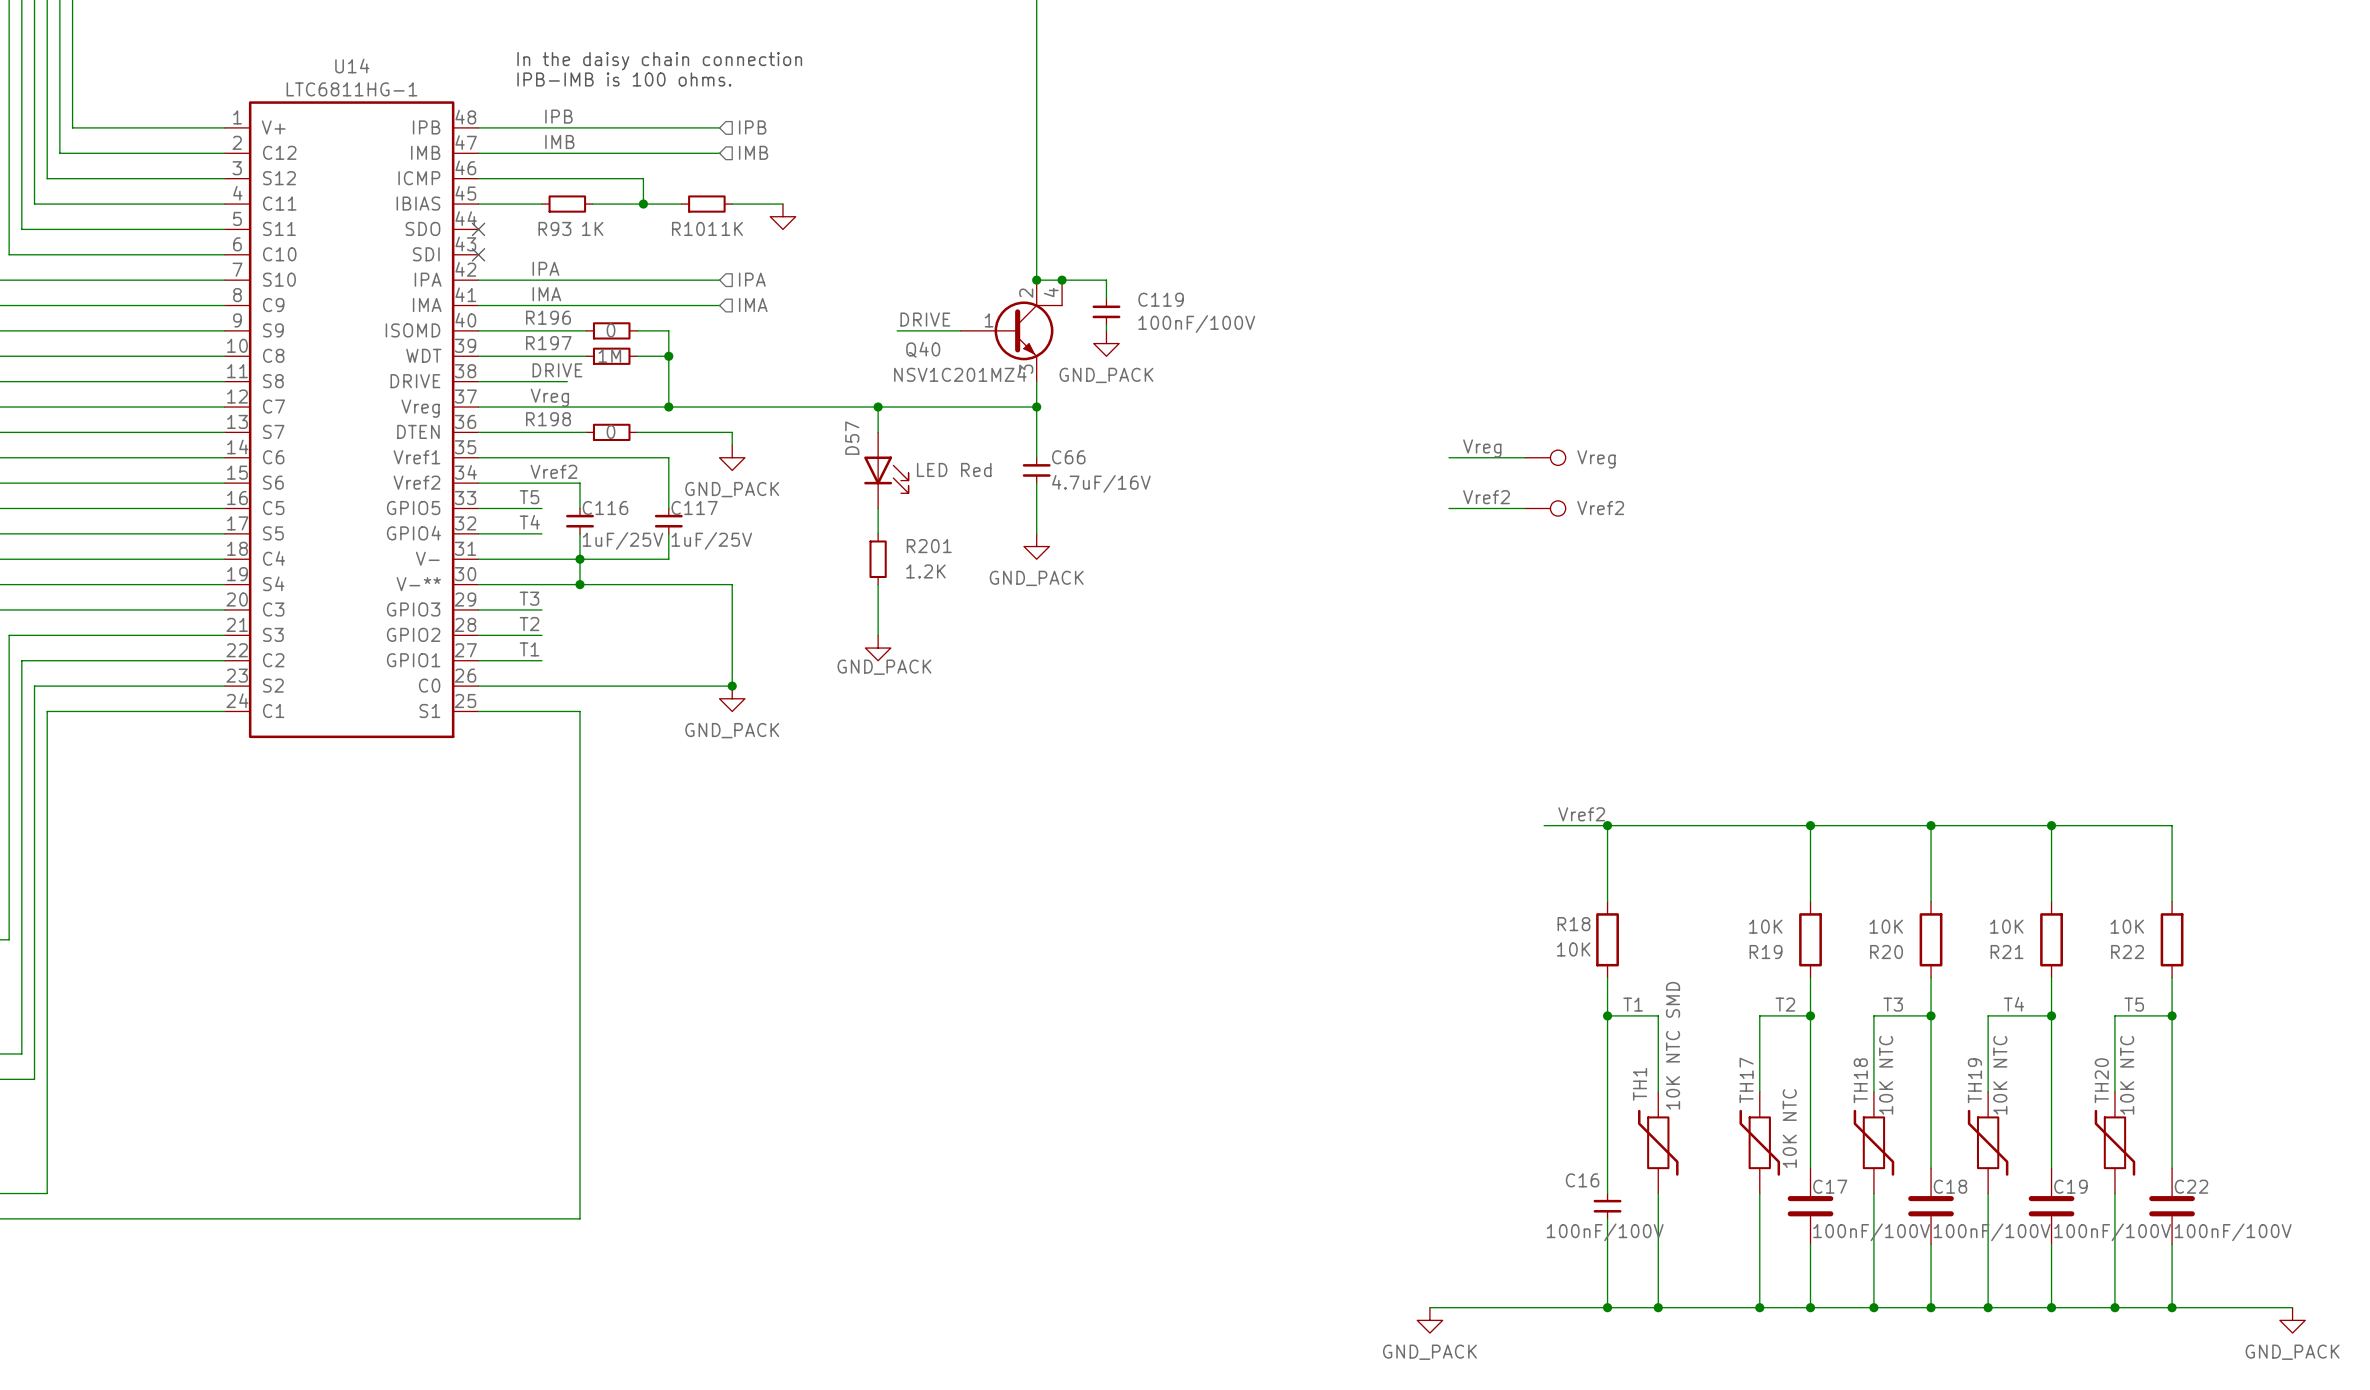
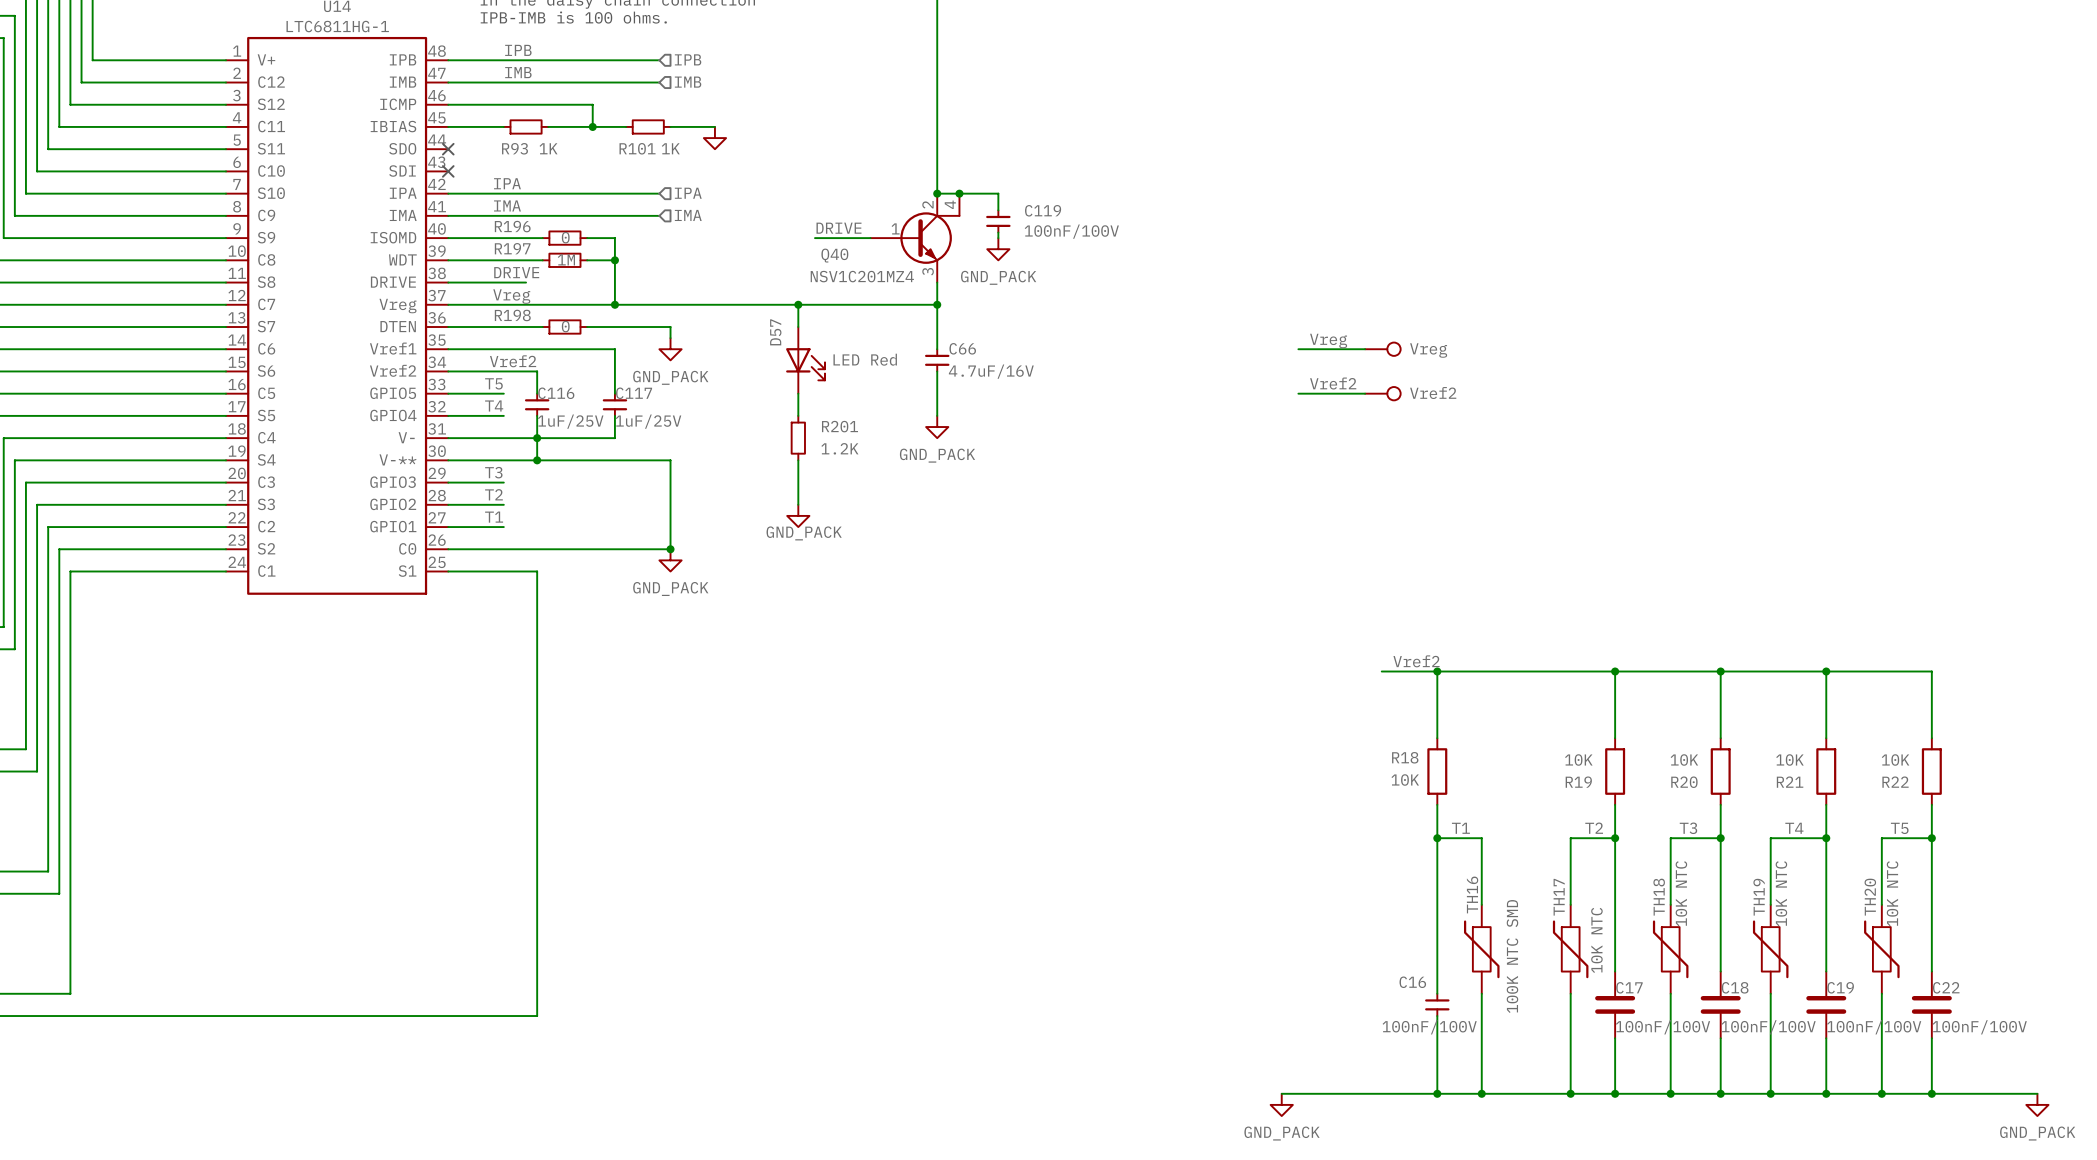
TH1 value: 10K NTC SMD (1673, 1045) -> 100K NTC SMD (1512, 956)
TH1 name: TH1 (1640, 1084) -> TH16 (1472, 894)

